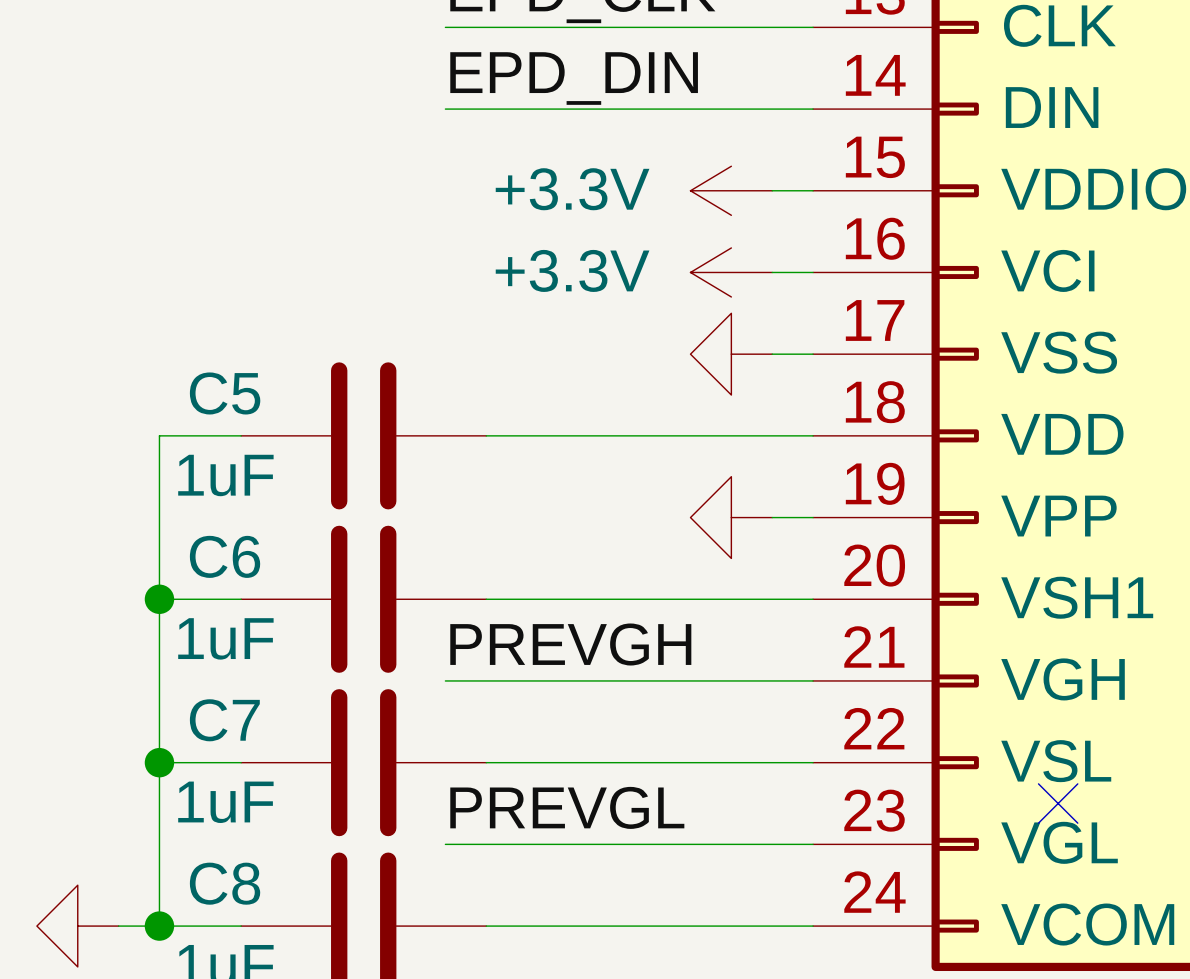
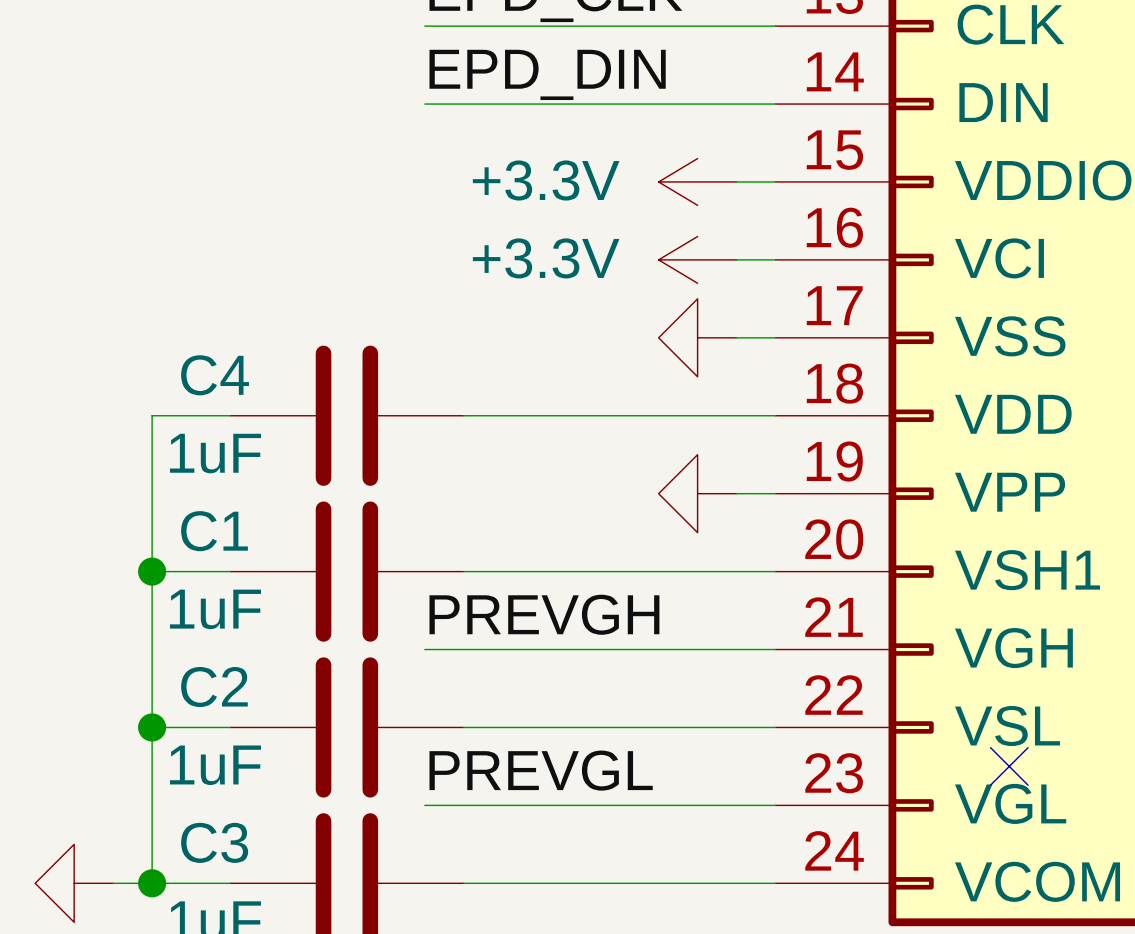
C5 name: C5 (225, 393) -> C4 (215, 375)
C6 name: C6 (225, 556) -> C1 (214, 531)
C7 name: C7 (224, 720) -> C2 (214, 687)
C8 name: C8 (225, 883) -> C3 (214, 842)

